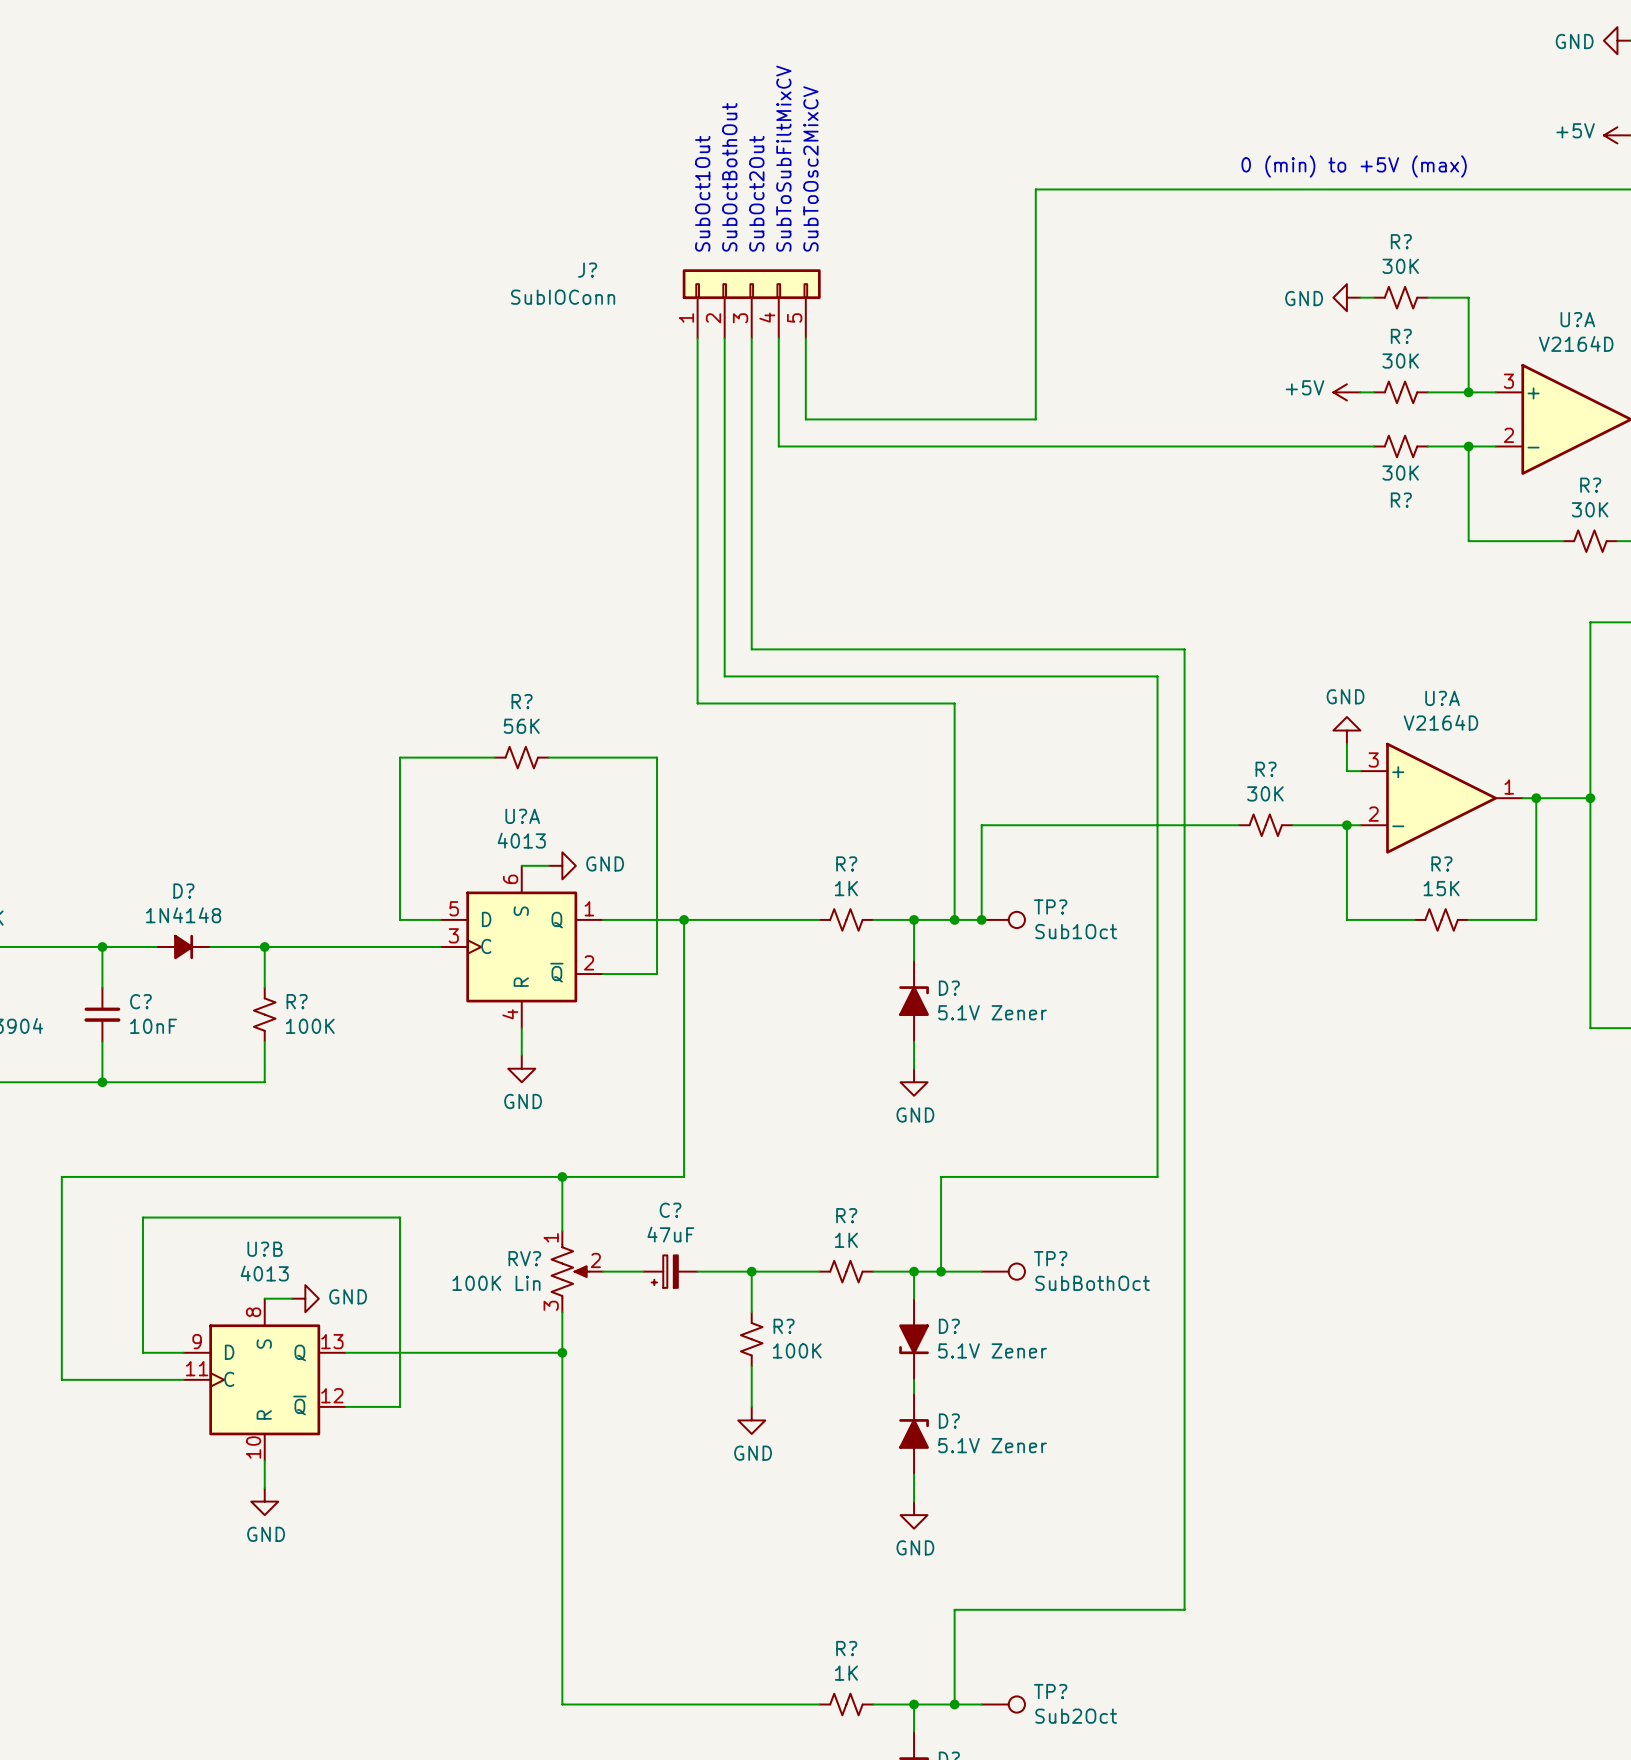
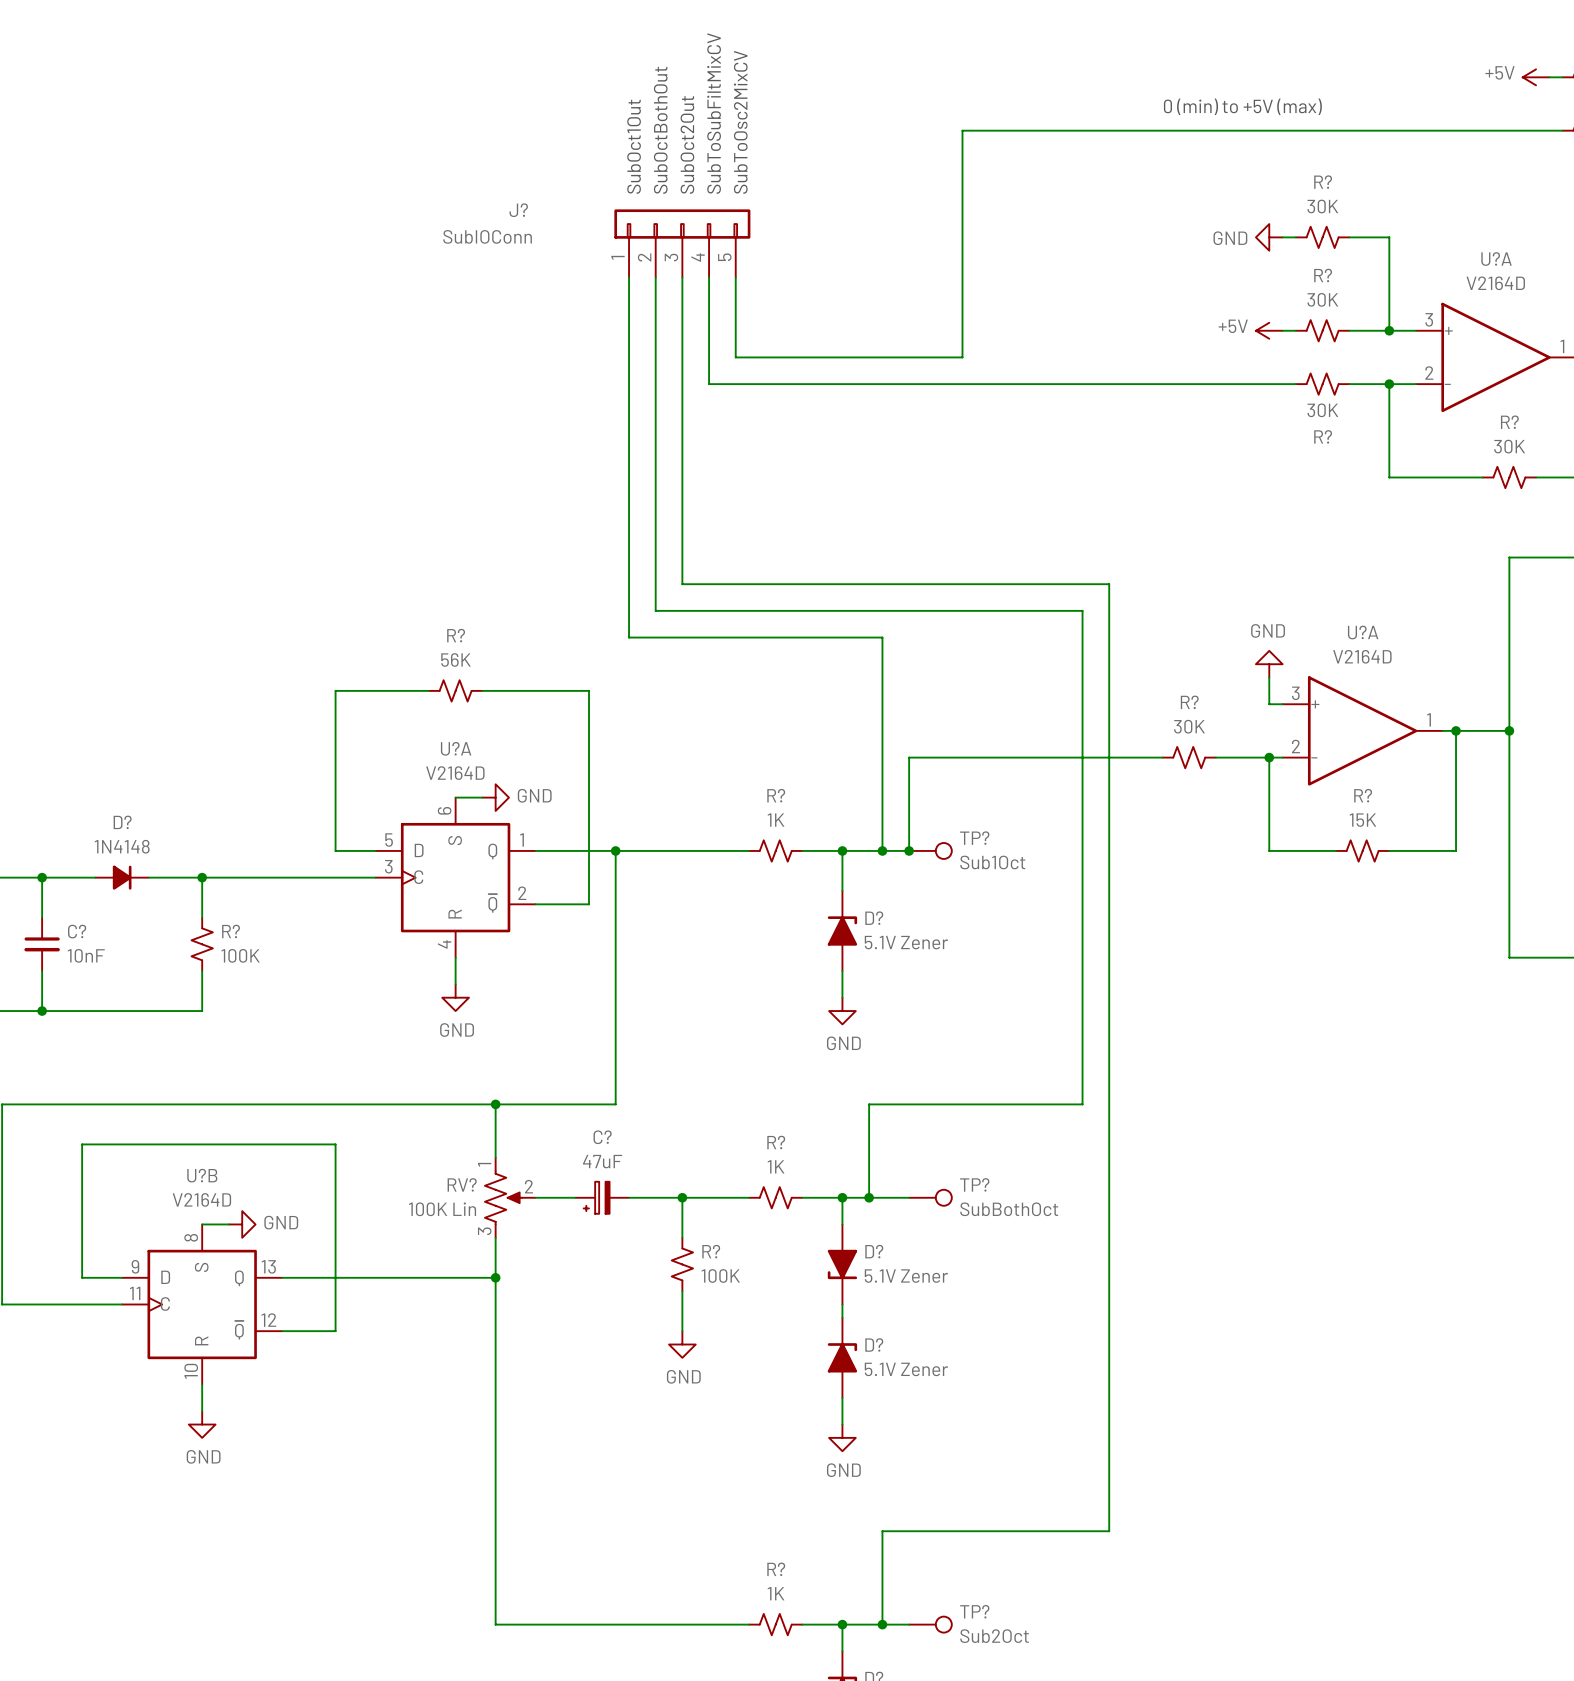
U?A value: 4013 (521, 840) -> V2164D (455, 773)
U?B value: 4013 (264, 1273) -> V2164D (201, 1199)

